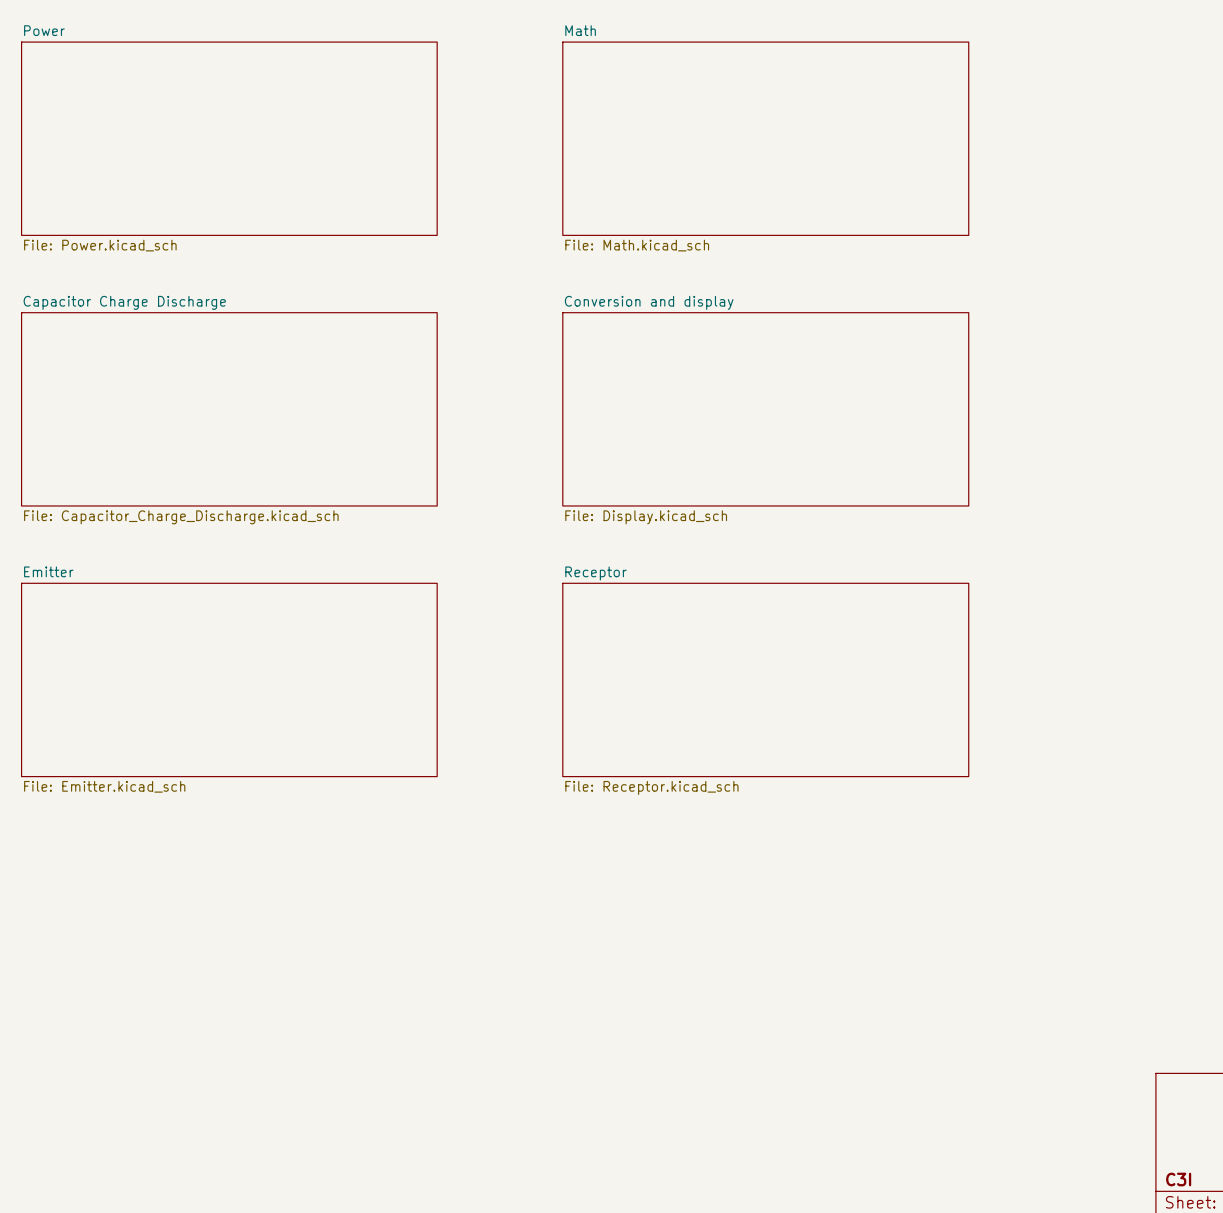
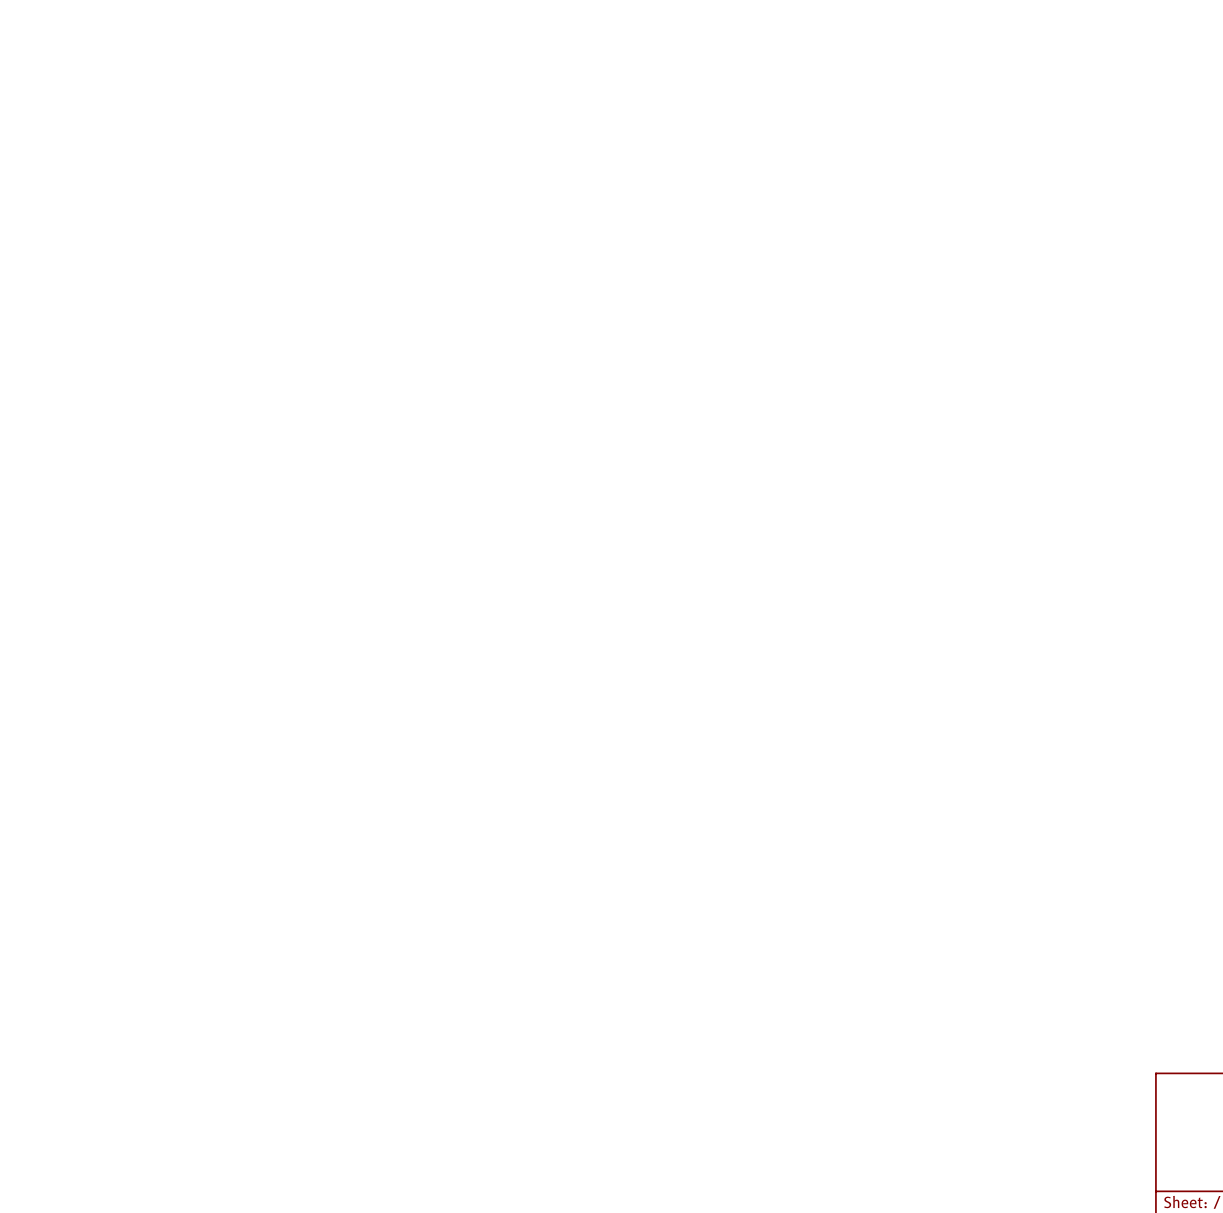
sheet Power: File: Power.kicad_sch (229, 138) -> none
sheet Math: File: Math.kicad_sch (765, 138) -> none
sheet Capacitor Charge Discharge: File: Capacitor_Charge_Discharge.kicad_sch (229, 409) -> none
sheet Conversion and display: File: Display.kicad_sch (765, 409) -> none
sheet Emitter: File: Emitter.kicad_sch (229, 679) -> none
sheet Receptor: File: Receptor.kicad_sch (765, 679) -> none
title block: C3I (1178, 1179) -> none

